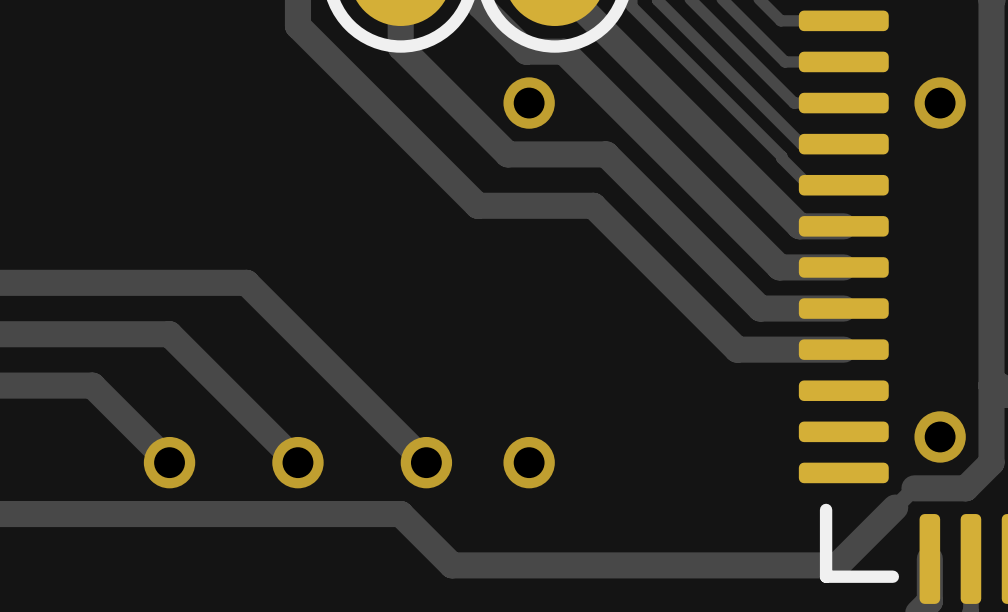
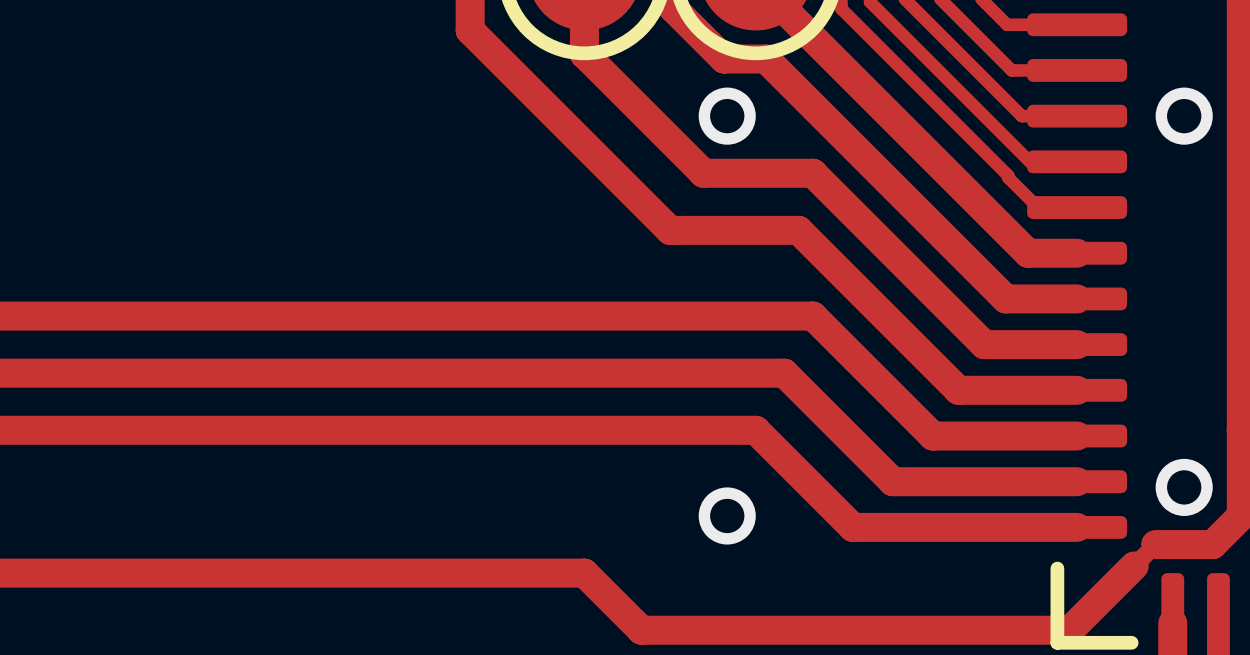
track: (246, 282) (426, 462) -> (413, 316) (812, 316) (932, 436) (1077, 436)
track: (169, 334) (297, 462) -> (327, 373) (784, 373) (892, 481) (1077, 481)
track: (92, 385) (169, 462) -> (241, 430) (755, 430) (852, 527) (1077, 527)
via: (169, 462) -> none
via: (297, 462) -> none
via: (426, 462) -> none

